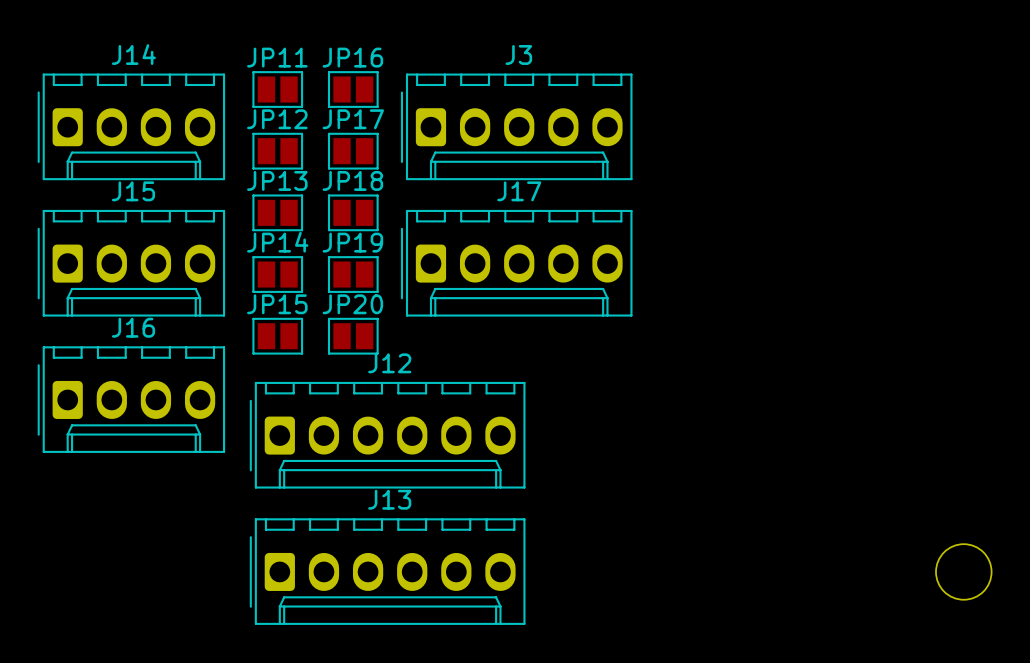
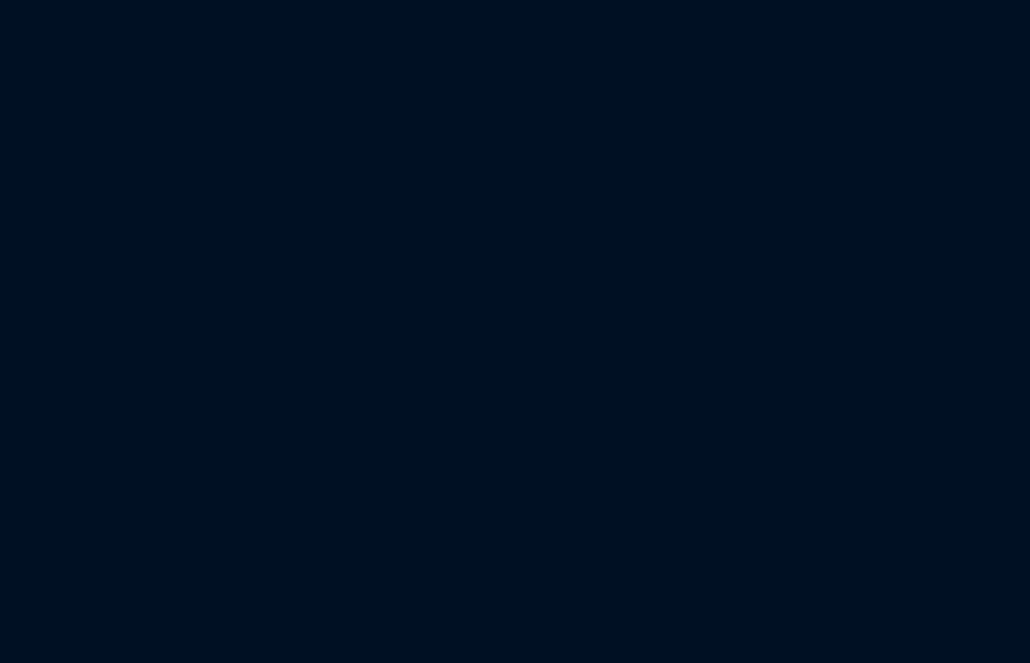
JP11: (277, 89) -> none
JP16: (353, 89) -> none
J14: (131, 126) -> none
J3: (516, 126) -> none
JP12: (277, 151) -> none
JP17: (353, 151) -> none
JP13: (277, 212) -> none
JP18: (353, 212) -> none
J15: (131, 263) -> none
J17: (516, 263) -> none
JP14: (277, 274) -> none
JP19: (353, 274) -> none
JP15: (277, 336) -> none
JP20: (353, 336) -> none
J16: (131, 399) -> none
J12: (387, 435) -> none
round board edge: [935, 543, 993, 601] -> none
J13: (387, 571) -> none

